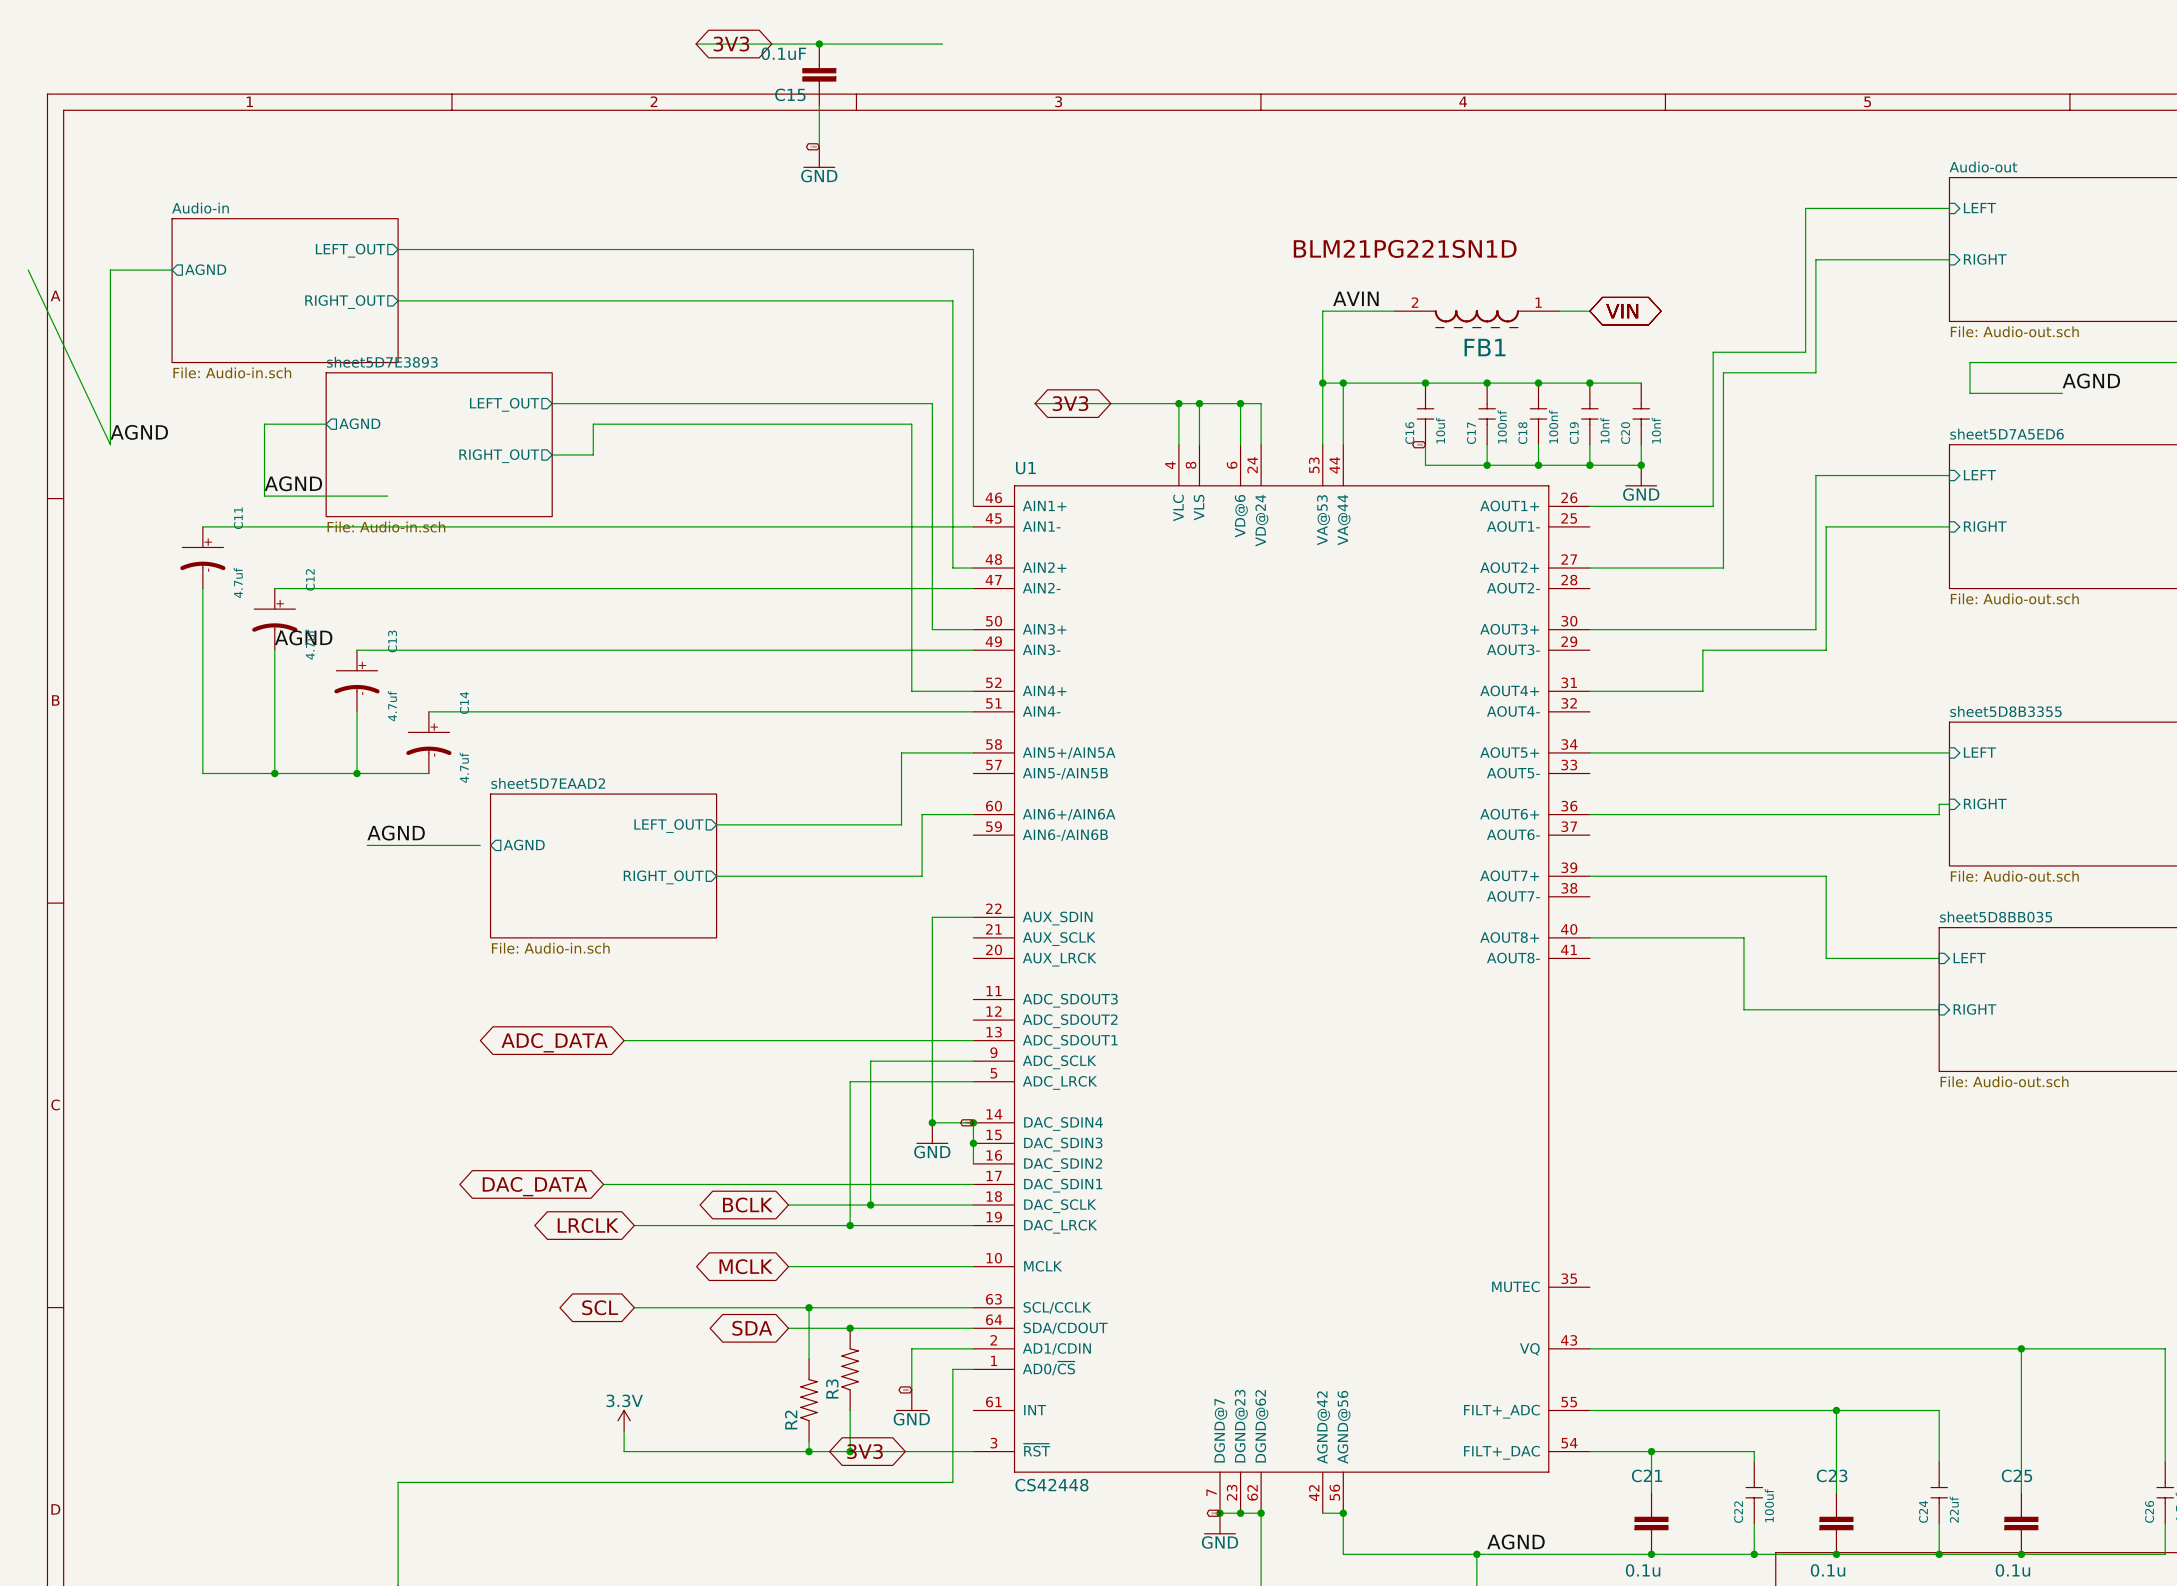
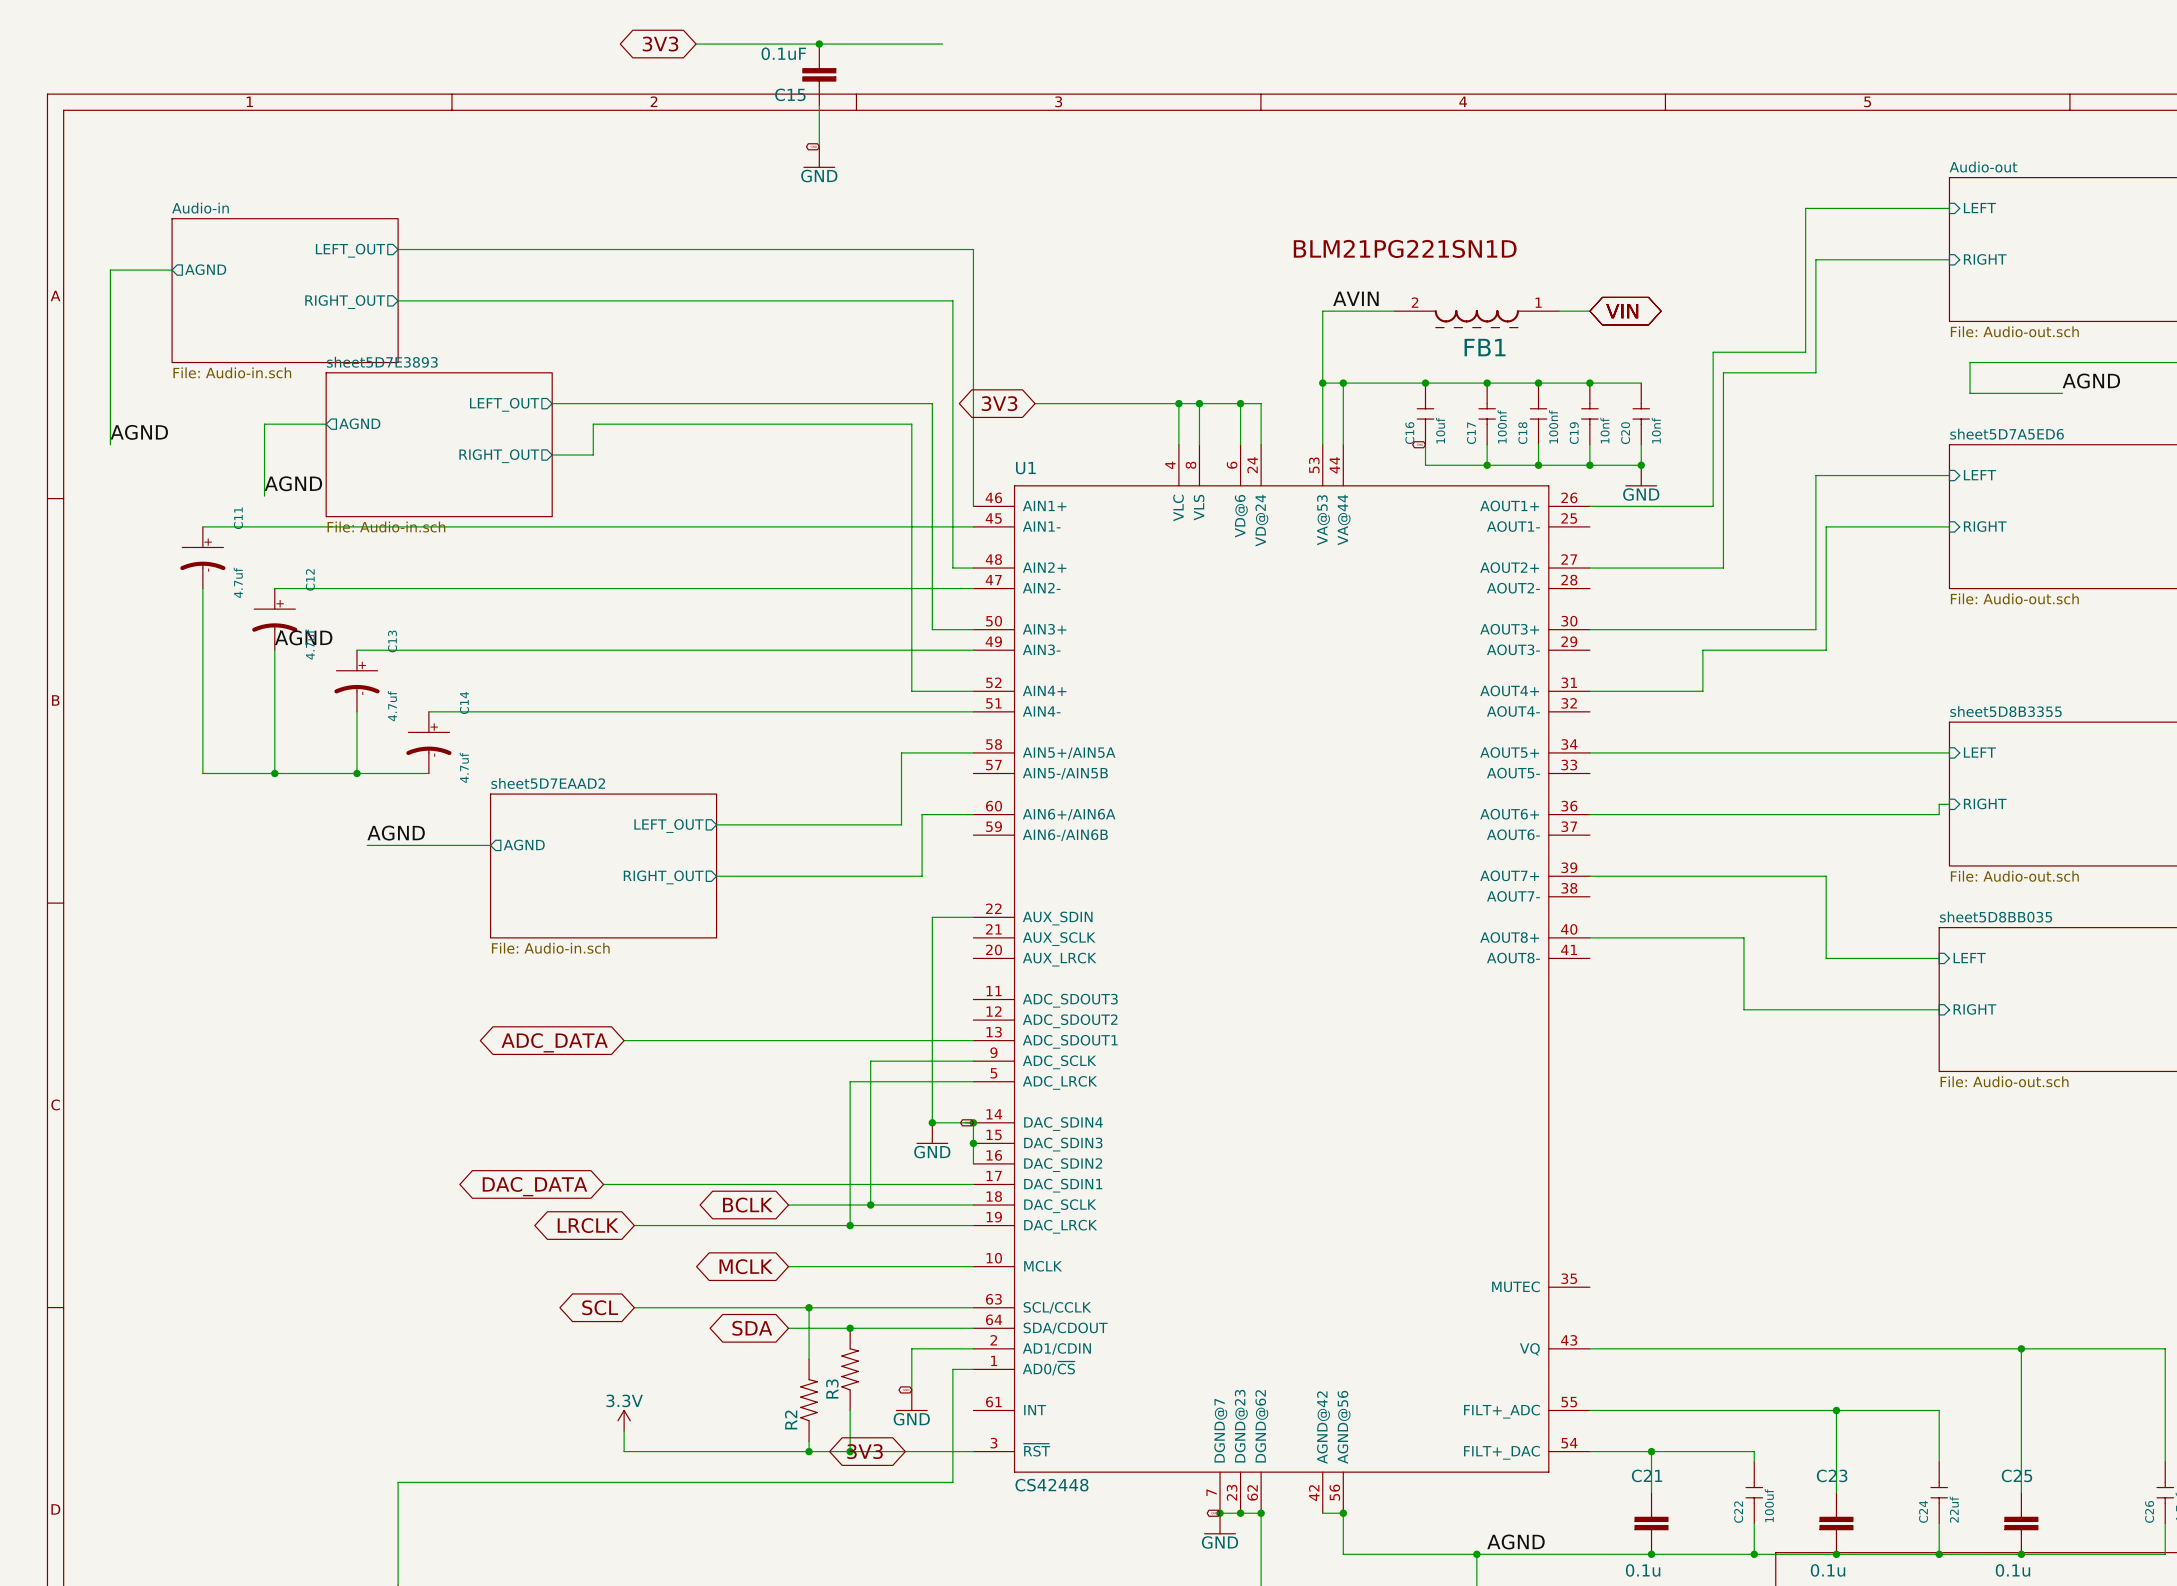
global label rotation: 0° (731, 44) -> 180° (660, 44)
global label position: 3V3 (731, 44) -> 3V3 (660, 44)
wire: (28, 270) (110, 444) -> none
global label rotation: 0° (1070, 403) -> 180° (999, 403)
wire: (264, 496) (387, 496) -> none
wire: none -> (480, 845) (490, 845)

